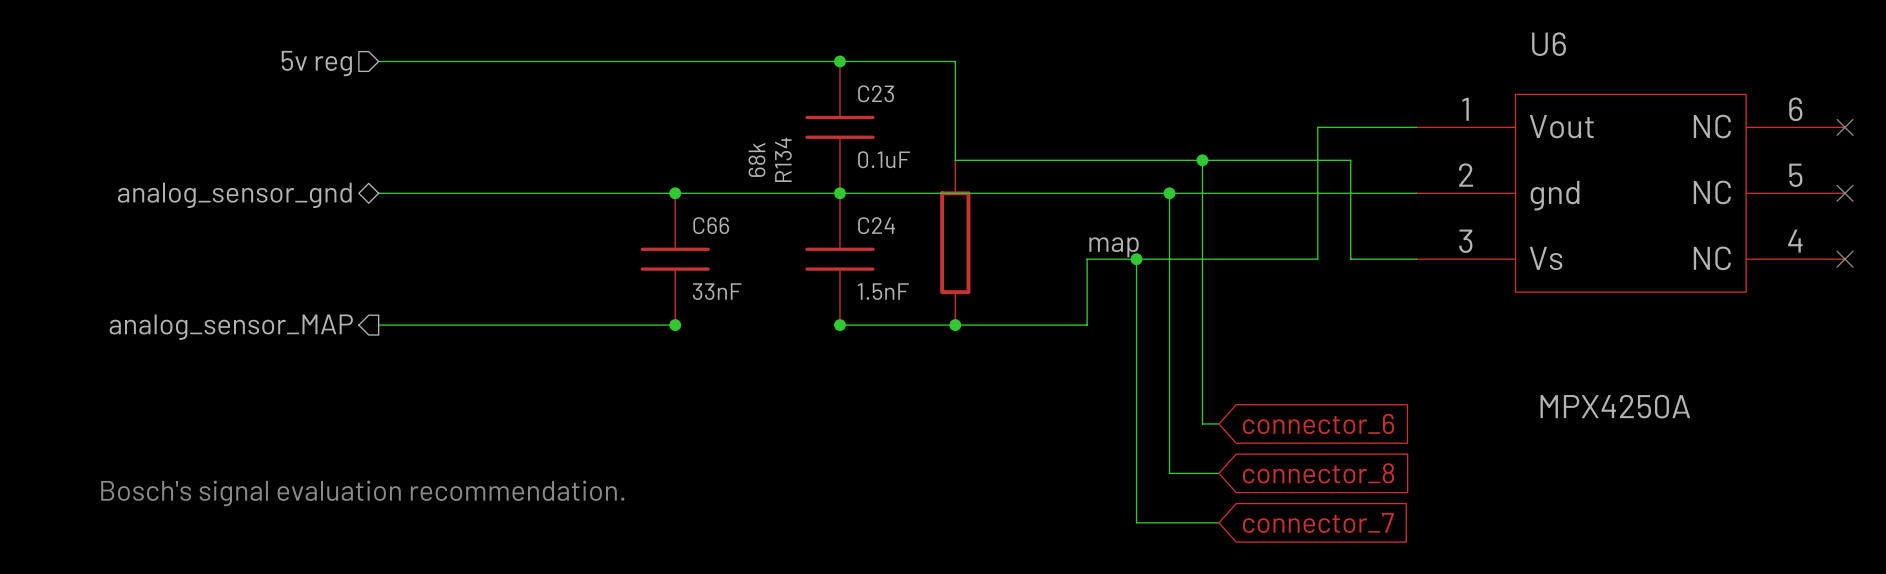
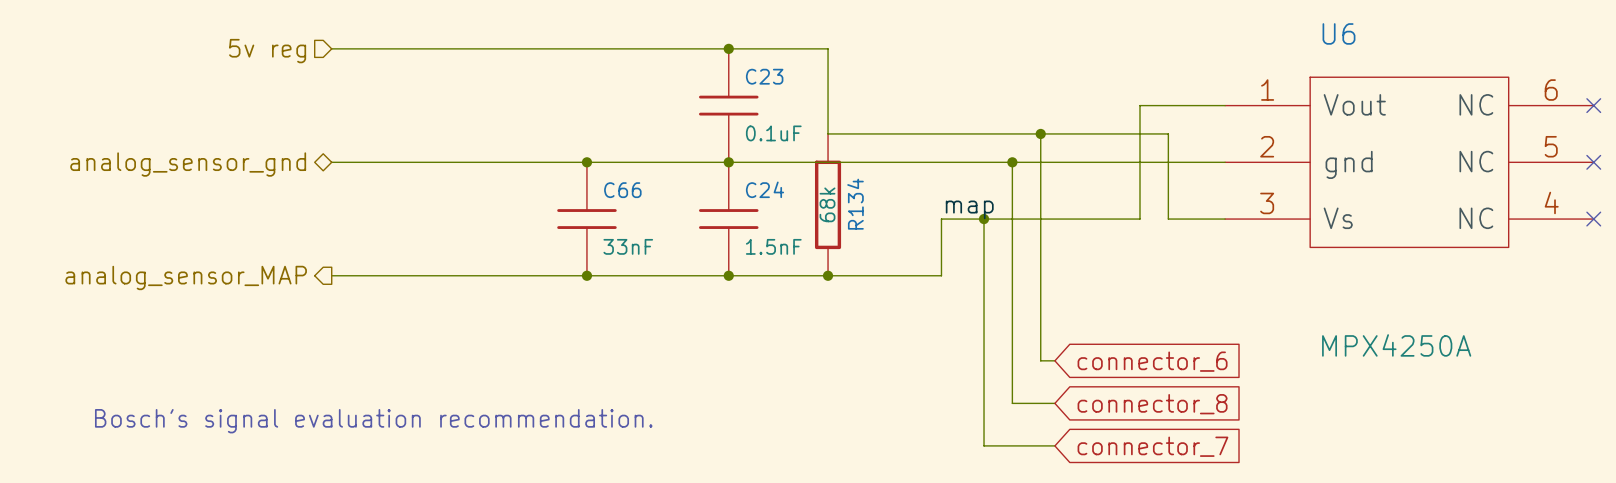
R134 value position: 68k (756, 159) -> 68k (827, 204)
R134 name position: R134 (783, 159) -> R134 (855, 204)
wire: none -> (586, 275) (728, 275)

